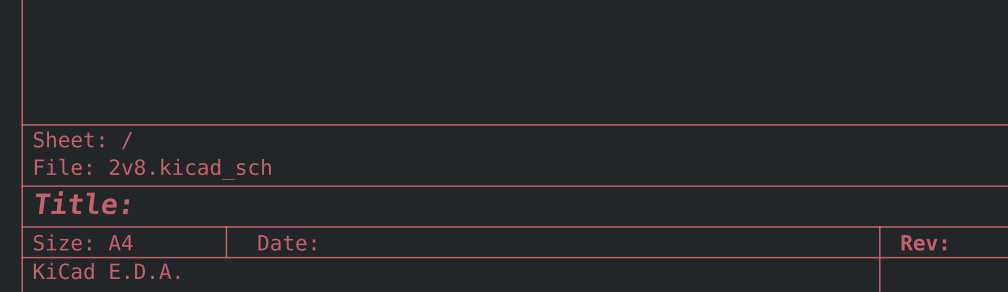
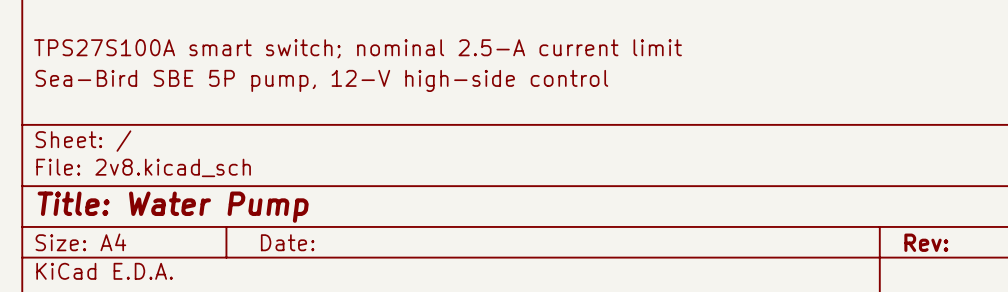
title block: none -> TPS27S100A smart switch; nominal 2.5-A current limit (357, 48)
title block: none -> Sea-Bird SBE 5P pump, 12-V high-side control (321, 80)
title block: Title: (82, 202) -> Title: Water Pump (173, 207)

